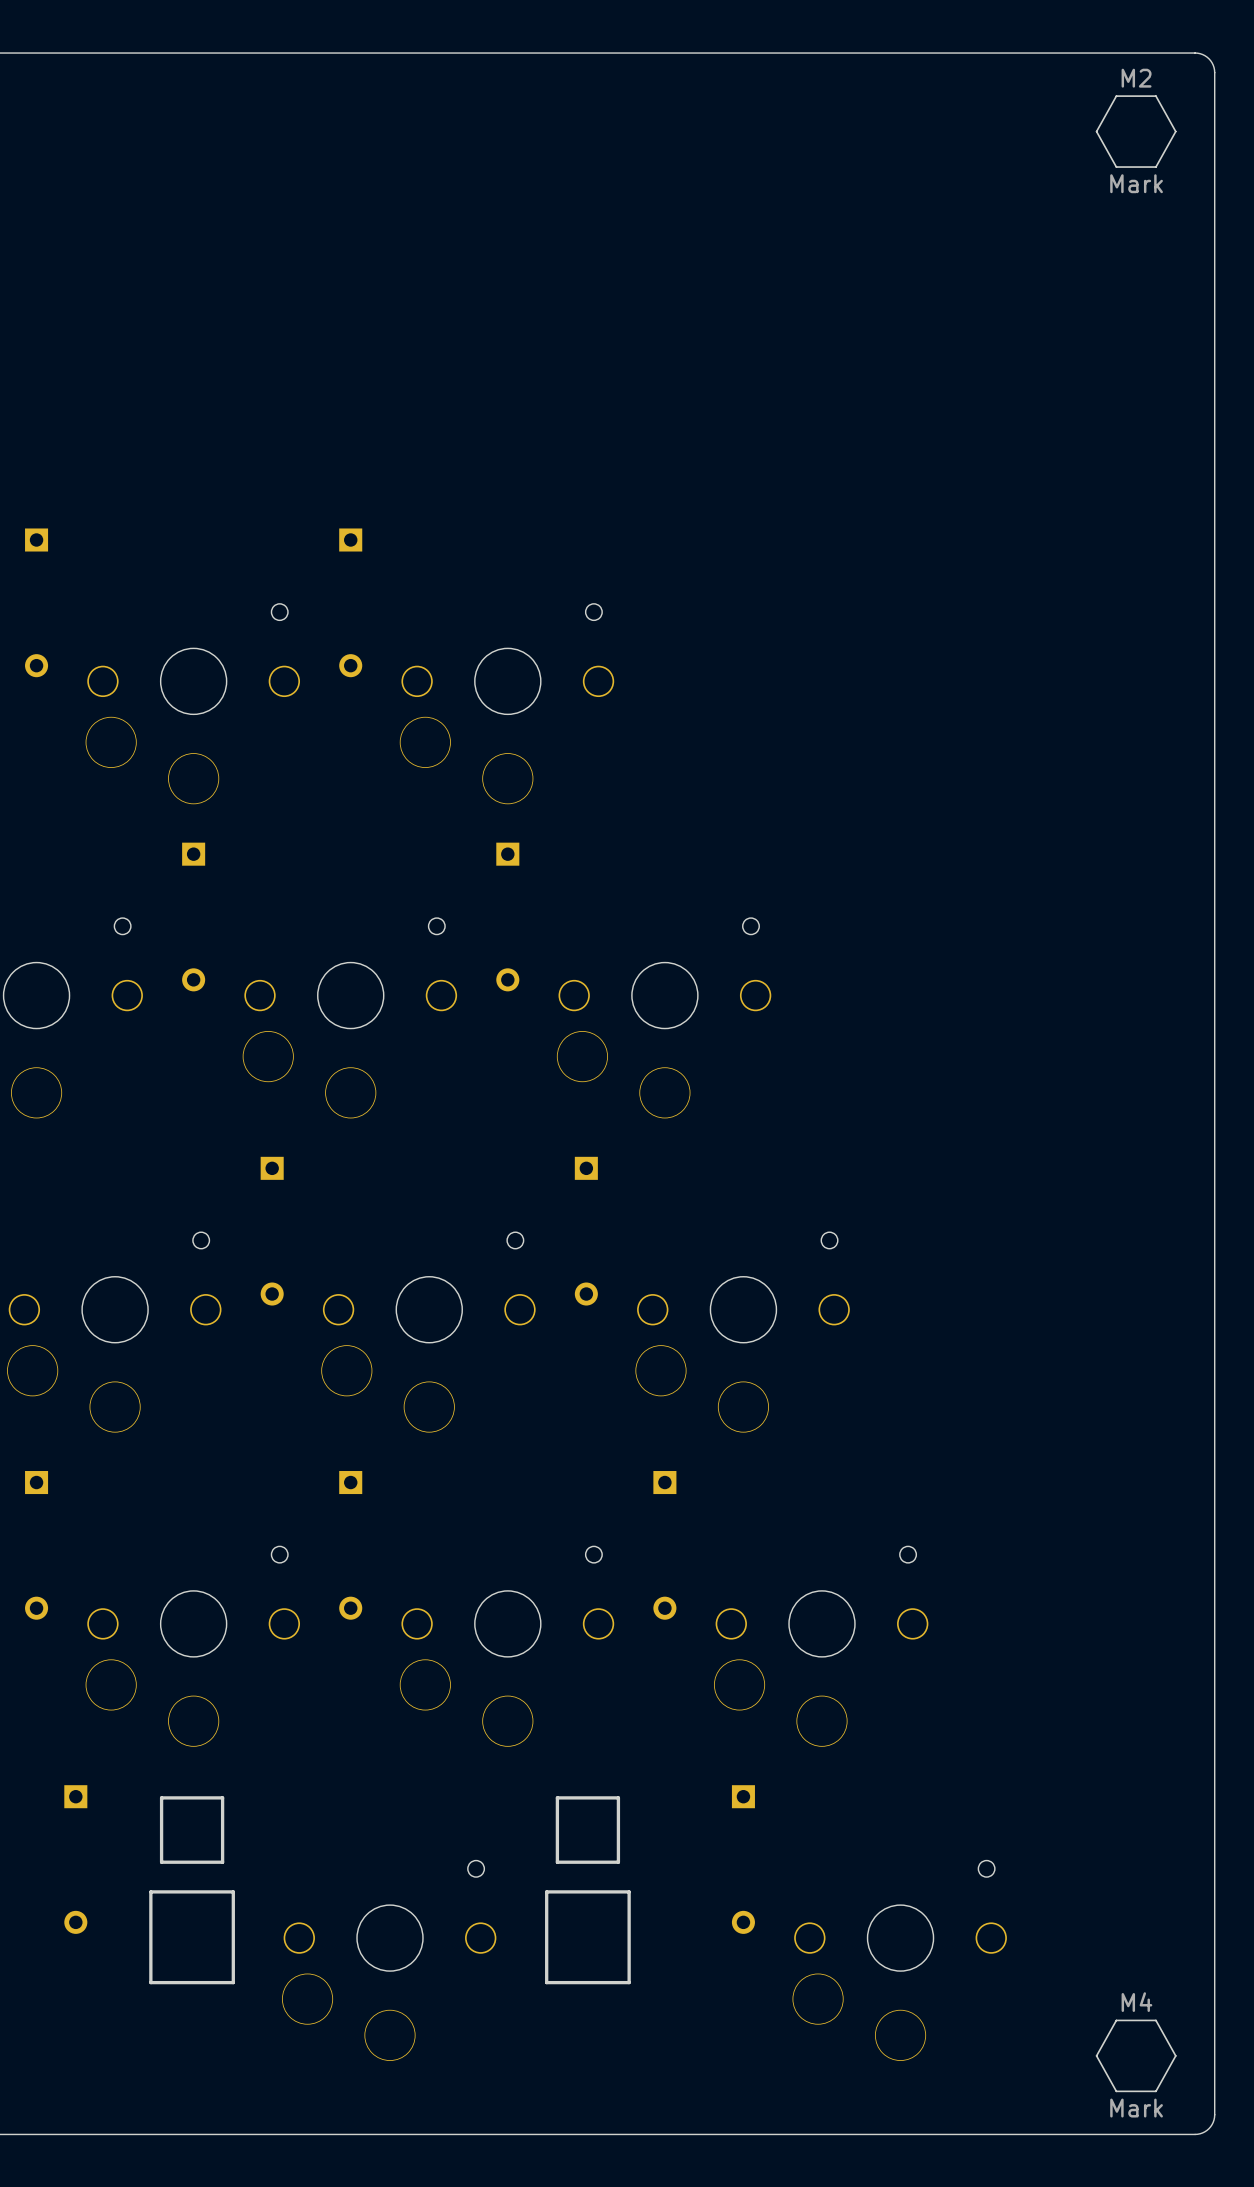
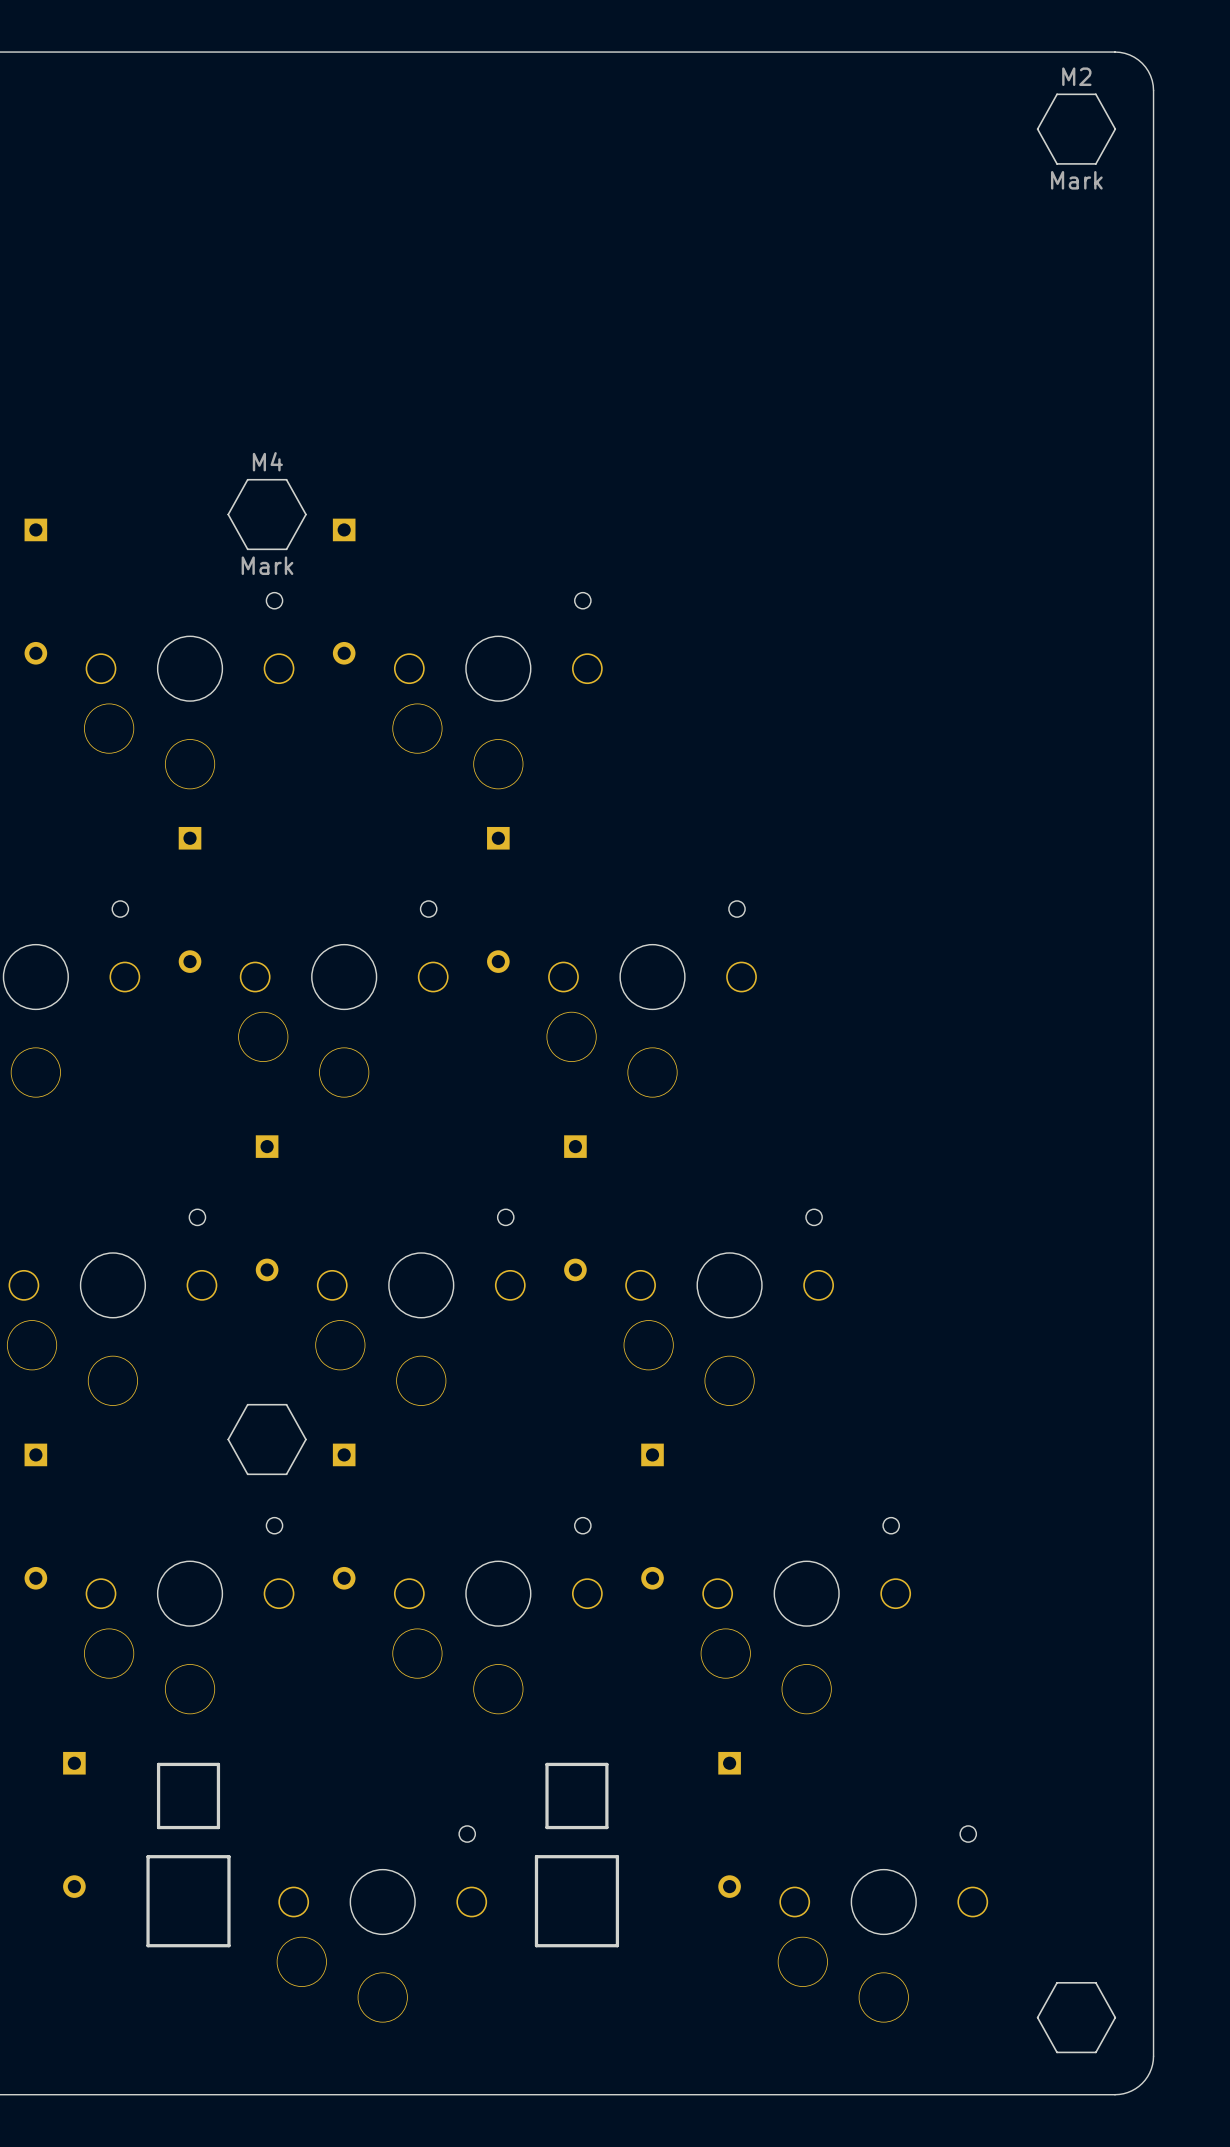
board edge: (1136, 53) (1200, 53) (1210, 60) (1214, 72) (1214, 2114) (1210, 2126) (1200, 2133) (1136, 2134) -> (1115, 52) (1129, 54) (1142, 63) (1150, 75) (1153, 90) (1153, 2056) (1151, 2068) (1142, 2083) (1131, 2090) (1115, 2094)
M2 position: (1136, 131) -> (1076, 129)
drawing: none -> [227, 1403, 307, 1476]
drawing: none -> [1036, 1982, 1117, 2054]
M4 position: (1136, 2055) -> (267, 514)

